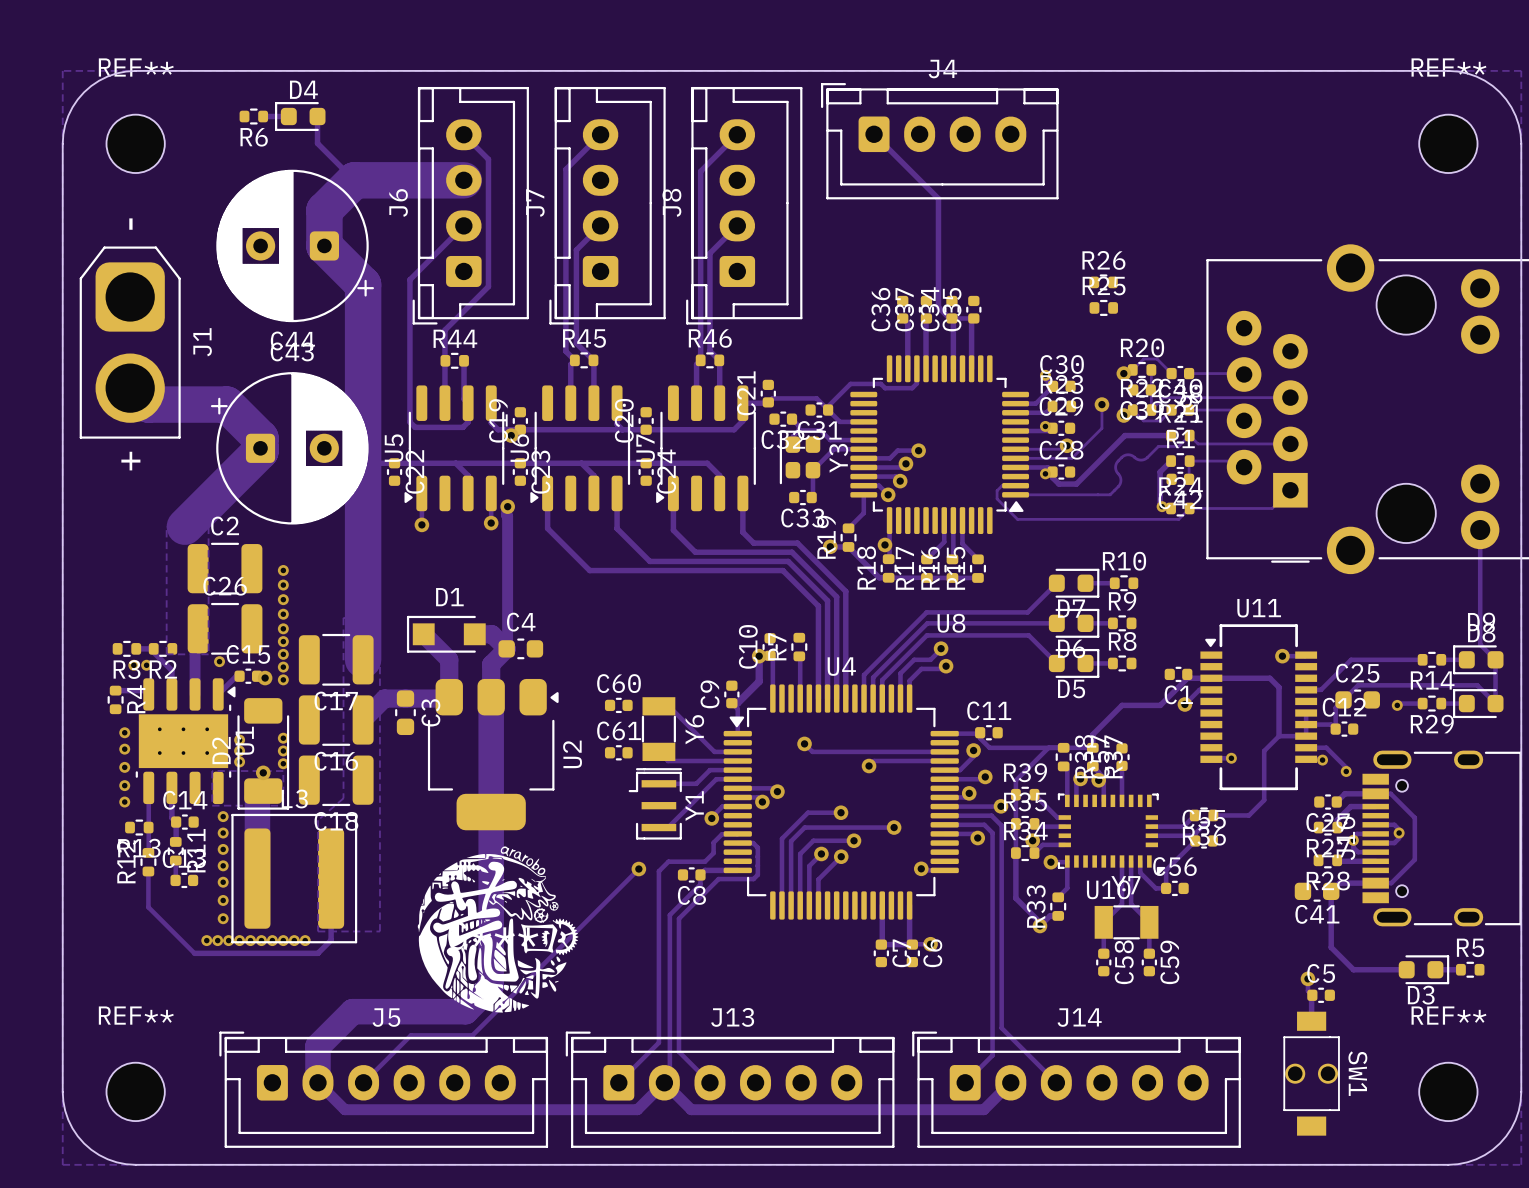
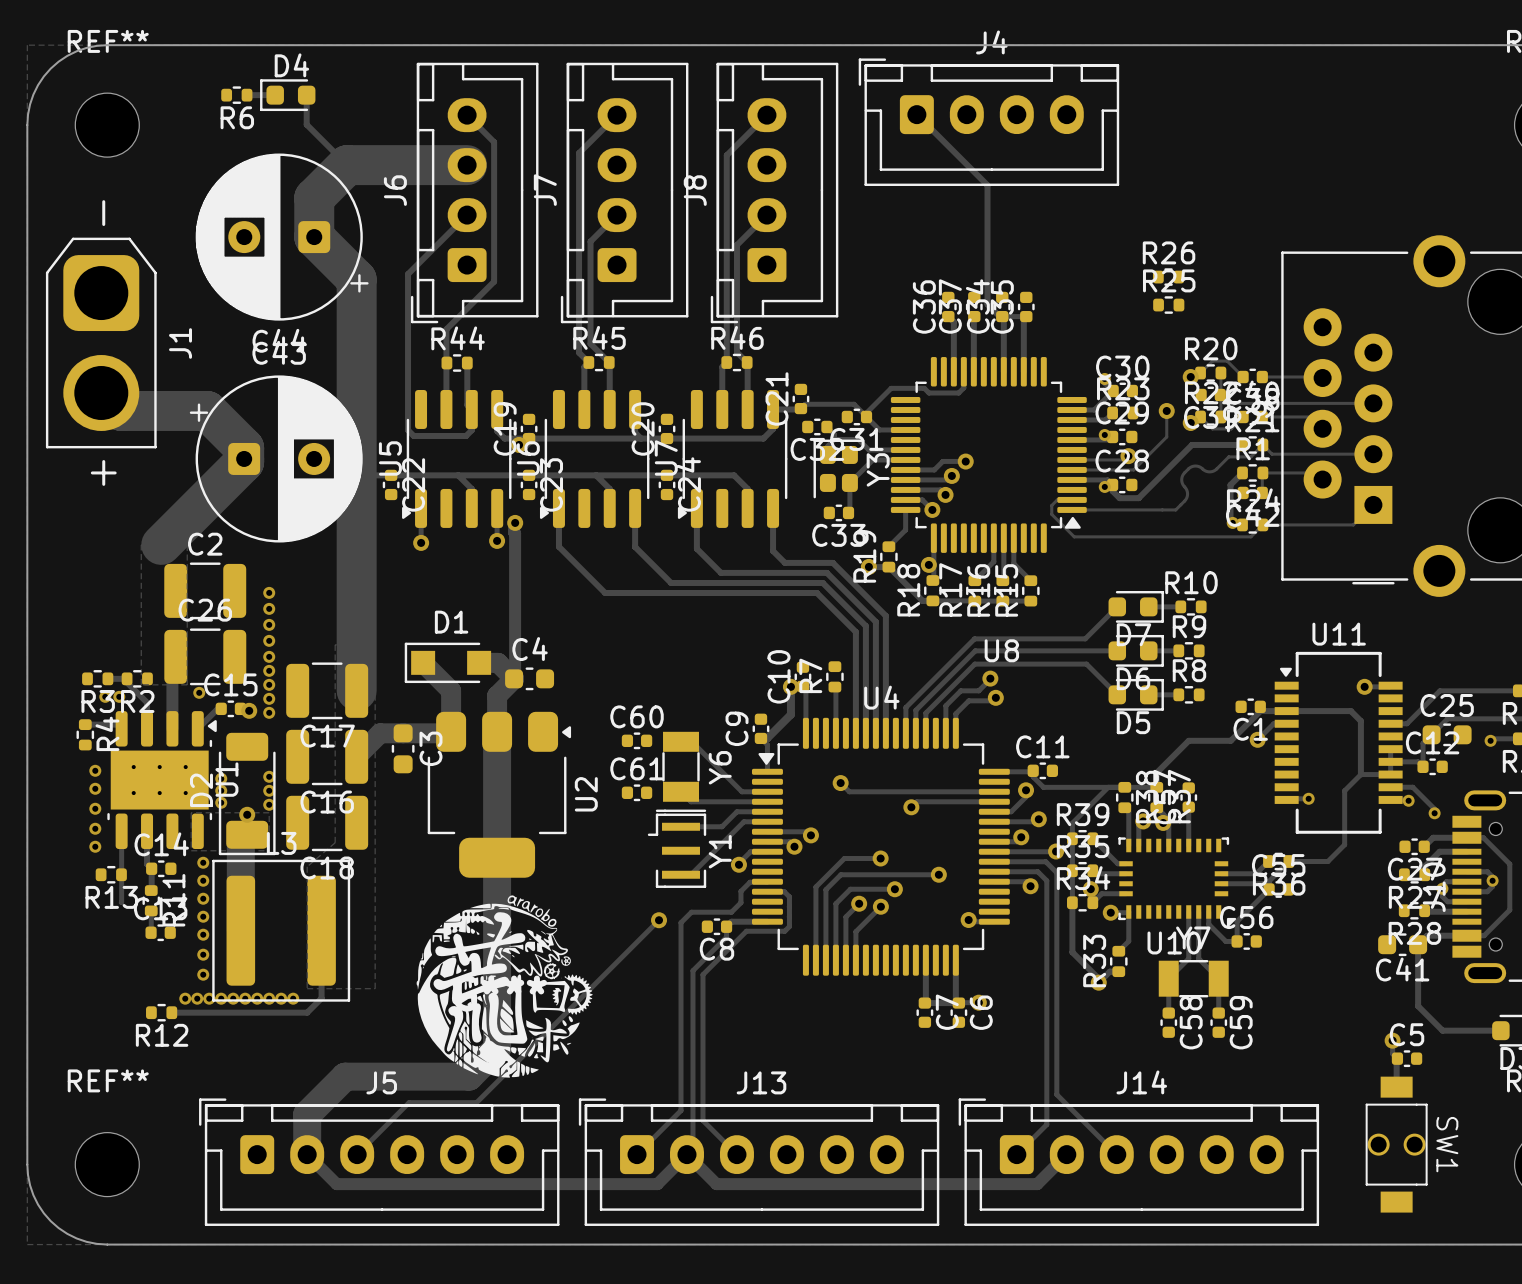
R12 rotation: 0° (148, 862) -> 90° clockwise (161, 1012)
R12 position: (148, 862) -> (161, 1012)
track: (148, 871) (148, 907) (194, 953) -> none

